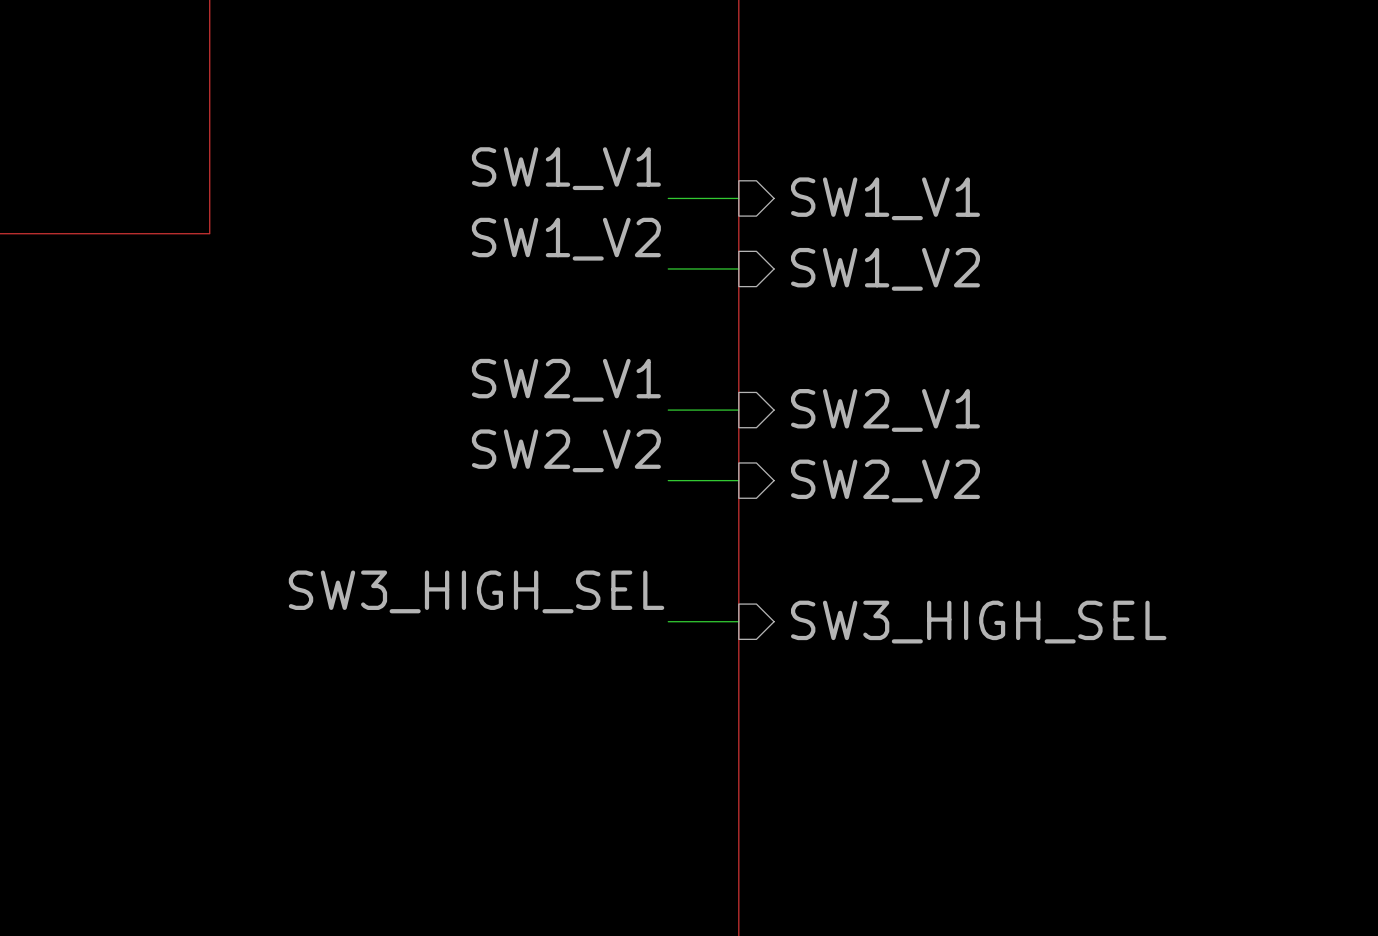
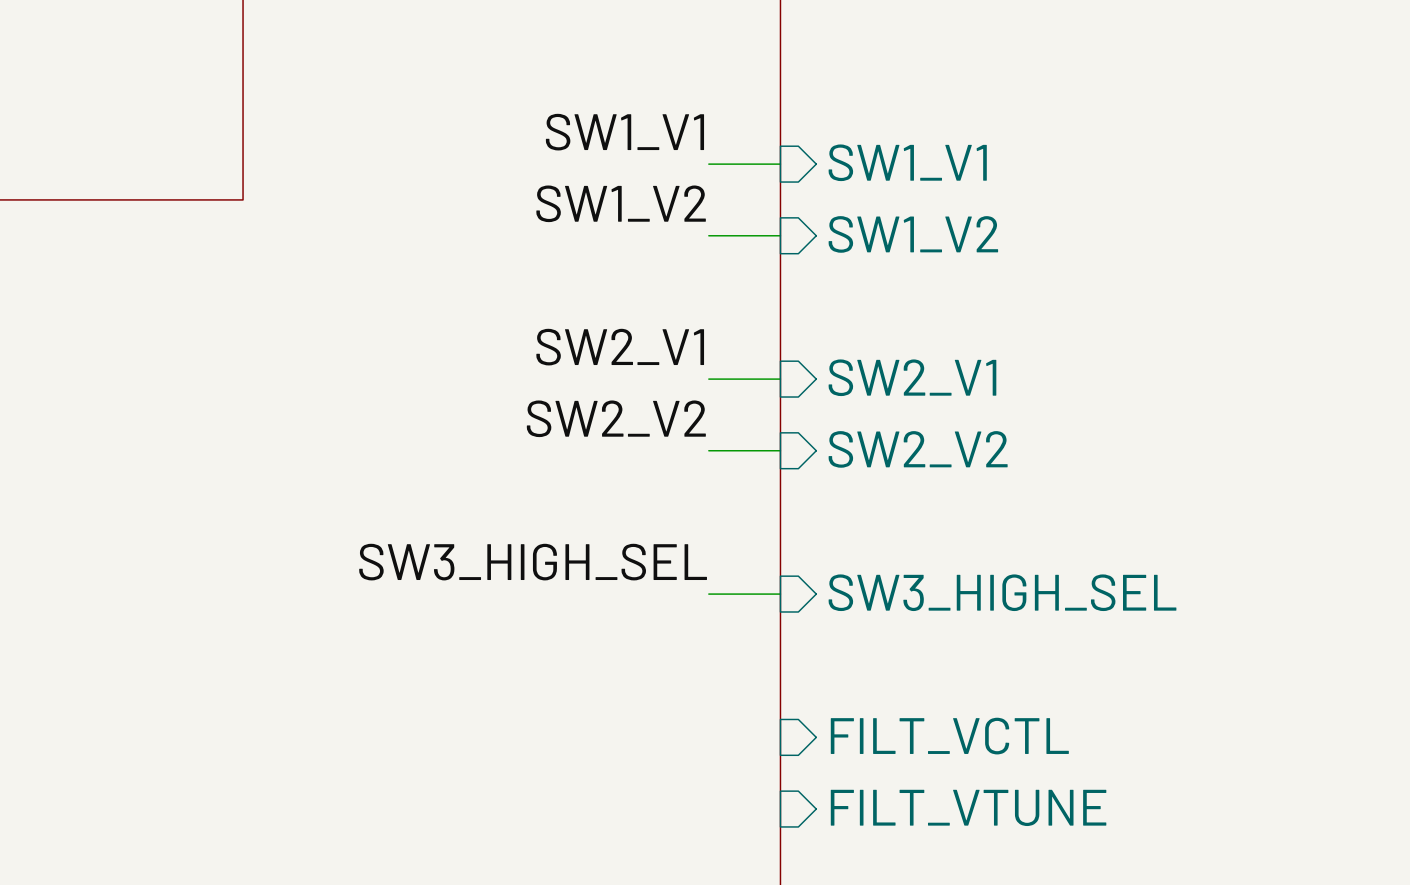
sheet pin: none -> FILT_VCTL (949, 736)
sheet pin: none -> FILT_VTUNE (968, 807)

